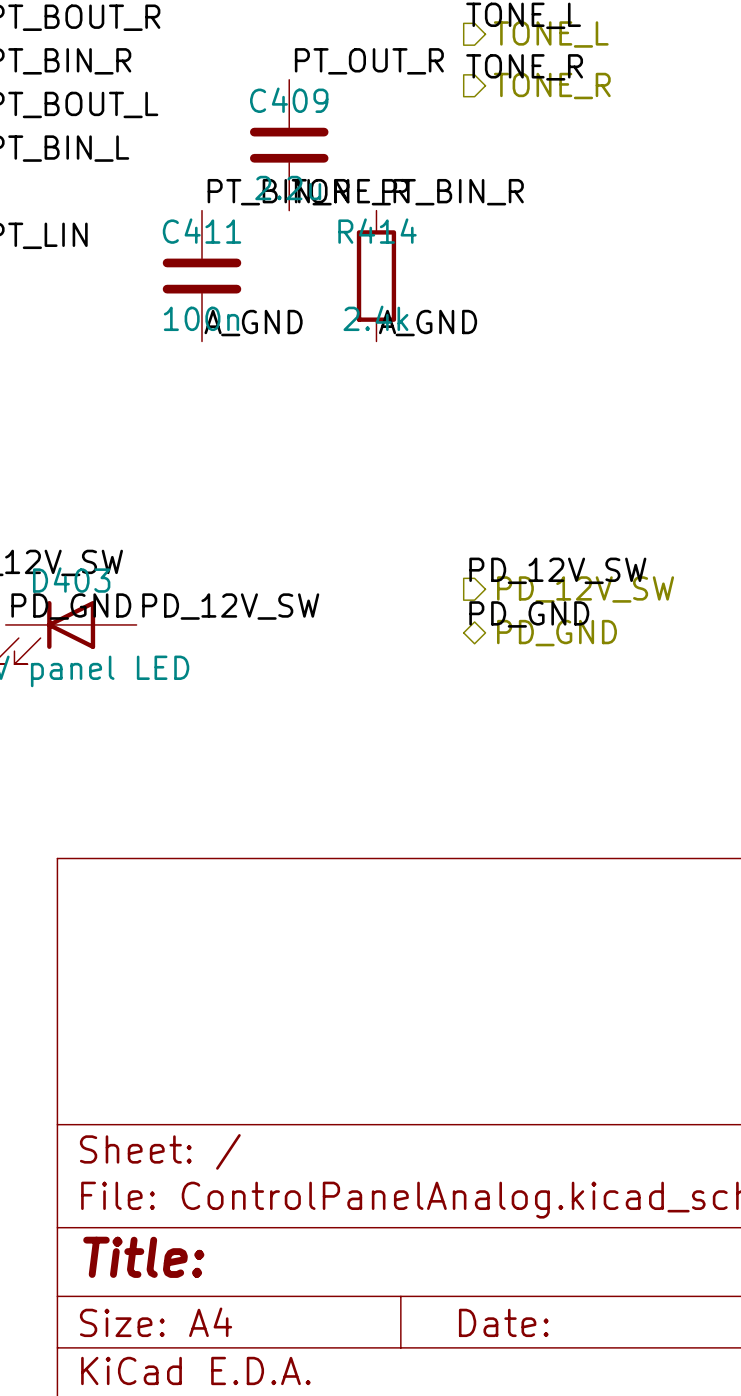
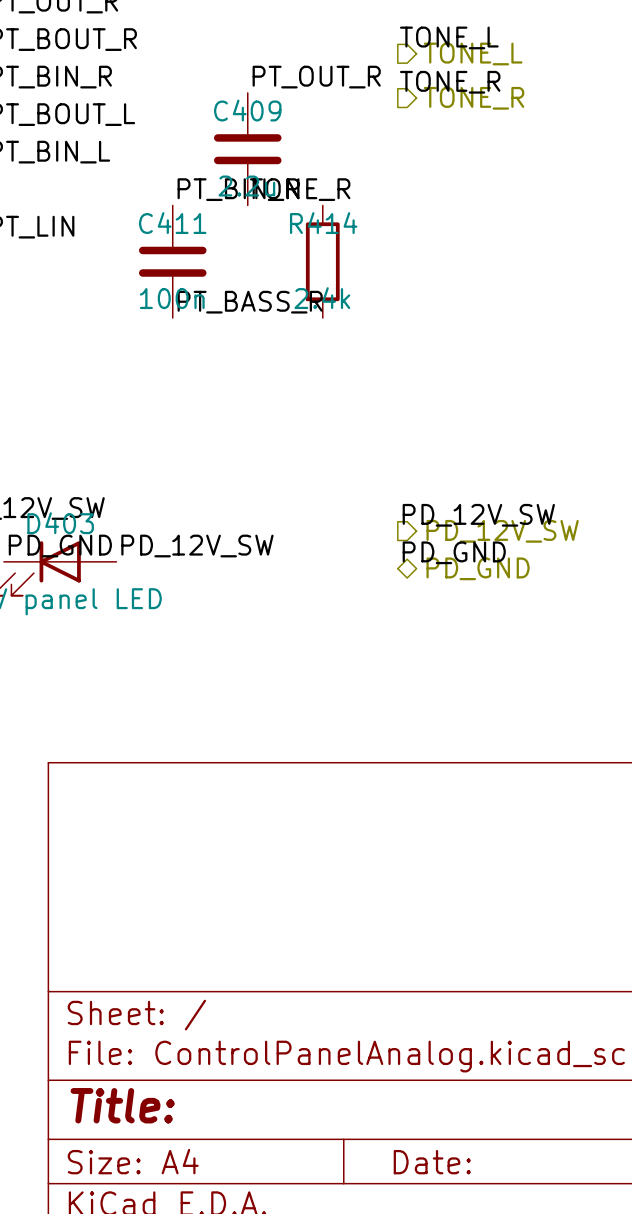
label: PT_BIN_R (452, 192) -> none
label: A_GND (253, 323) -> PT_BASS_R (250, 302)
label: A_GND (428, 323) -> none

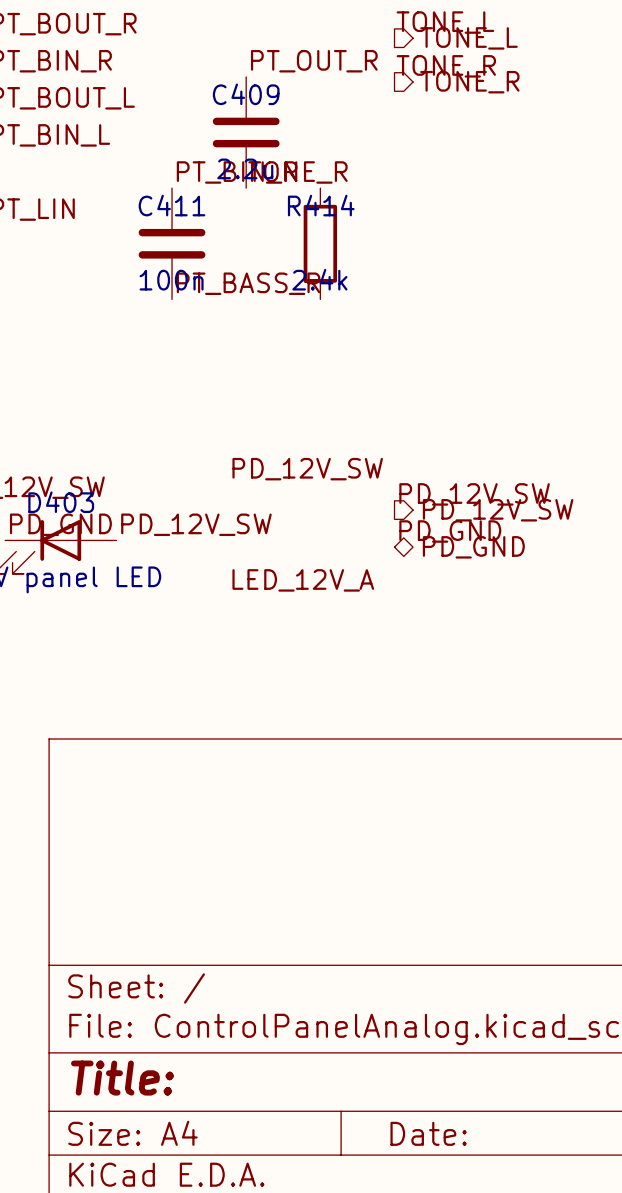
label: none -> PD_12V_SW (307, 469)
label: none -> LED_12V_A (303, 580)

